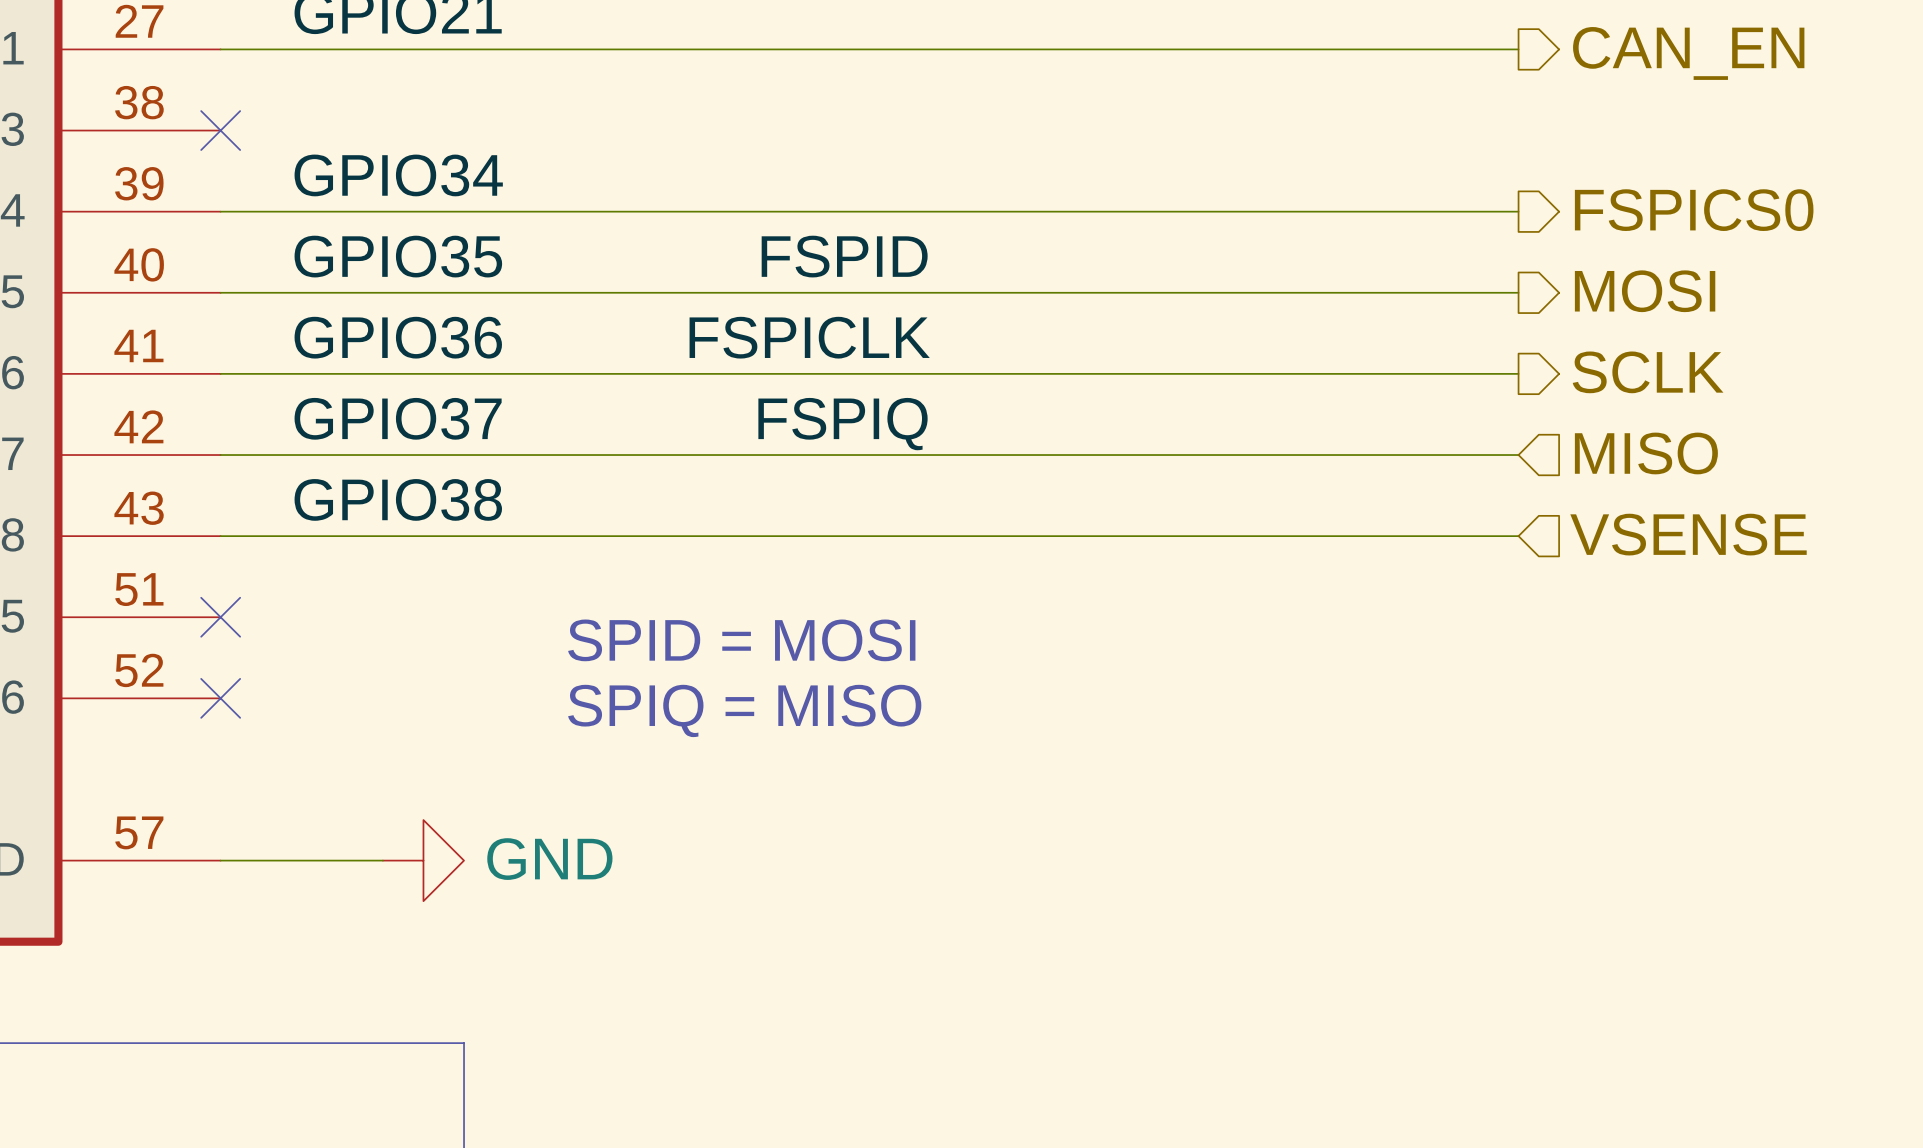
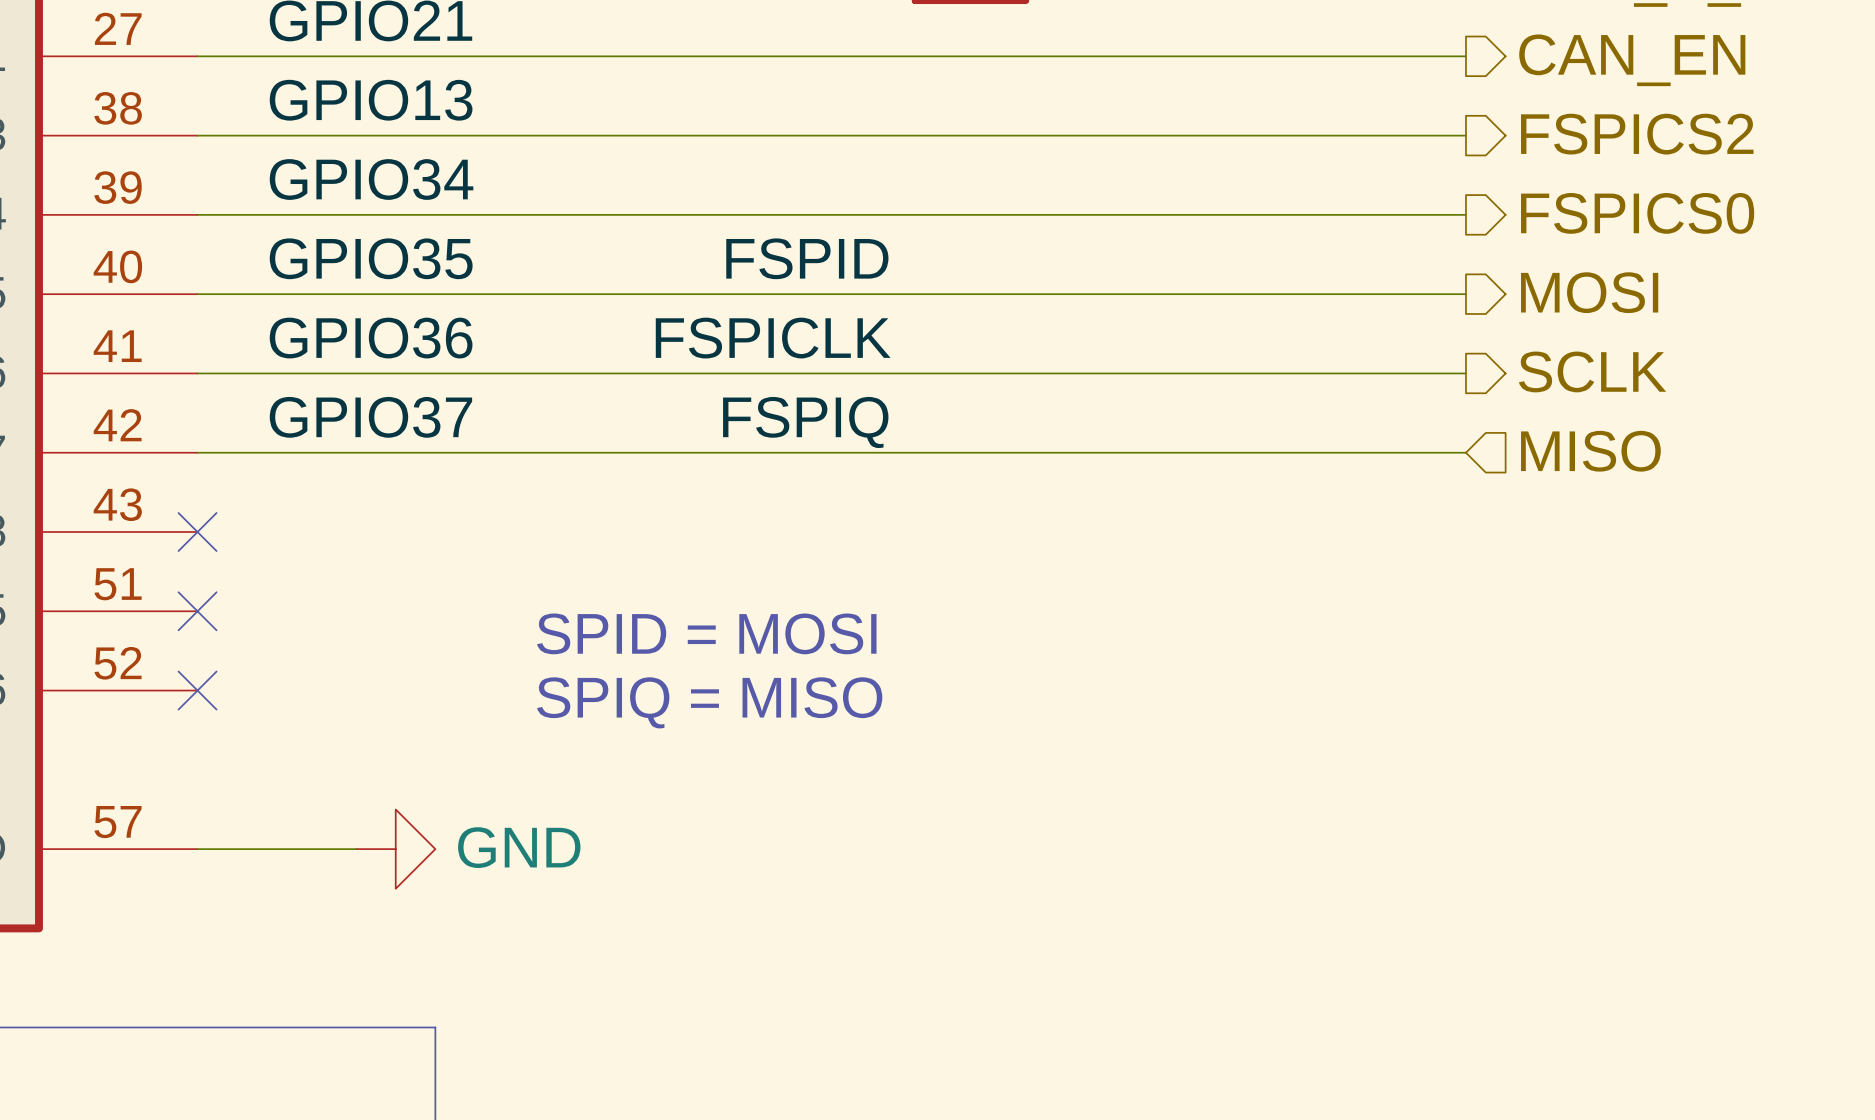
label: none -> GPIO13 (371, 100)
hierarchical label: none -> FSPICS2 (1637, 134)
no-connect mark: (220, 130) -> none
label: GPIO38 (398, 499) -> none
hierarchical label: VSENSE (1688, 534) -> none
wire: (220, 536) (1518, 536) -> (197, 135) (1465, 135)
no-connect mark: none -> (197, 532)

